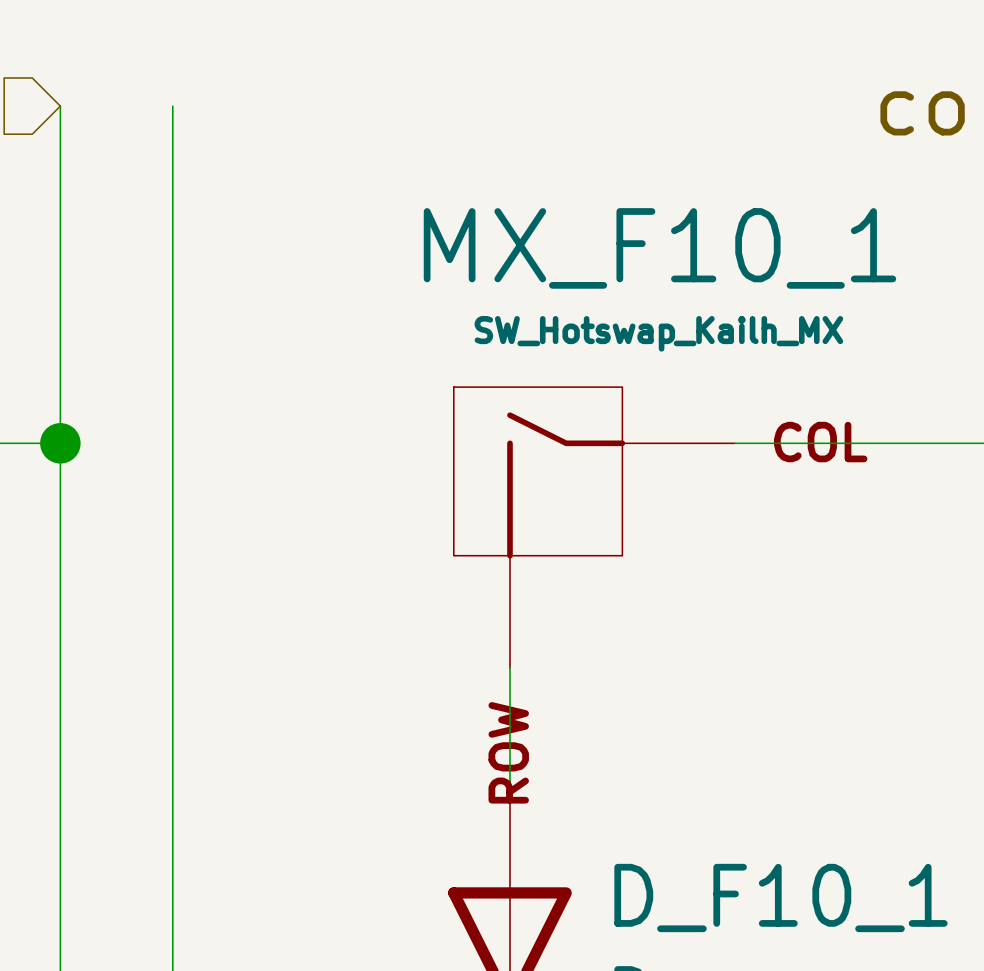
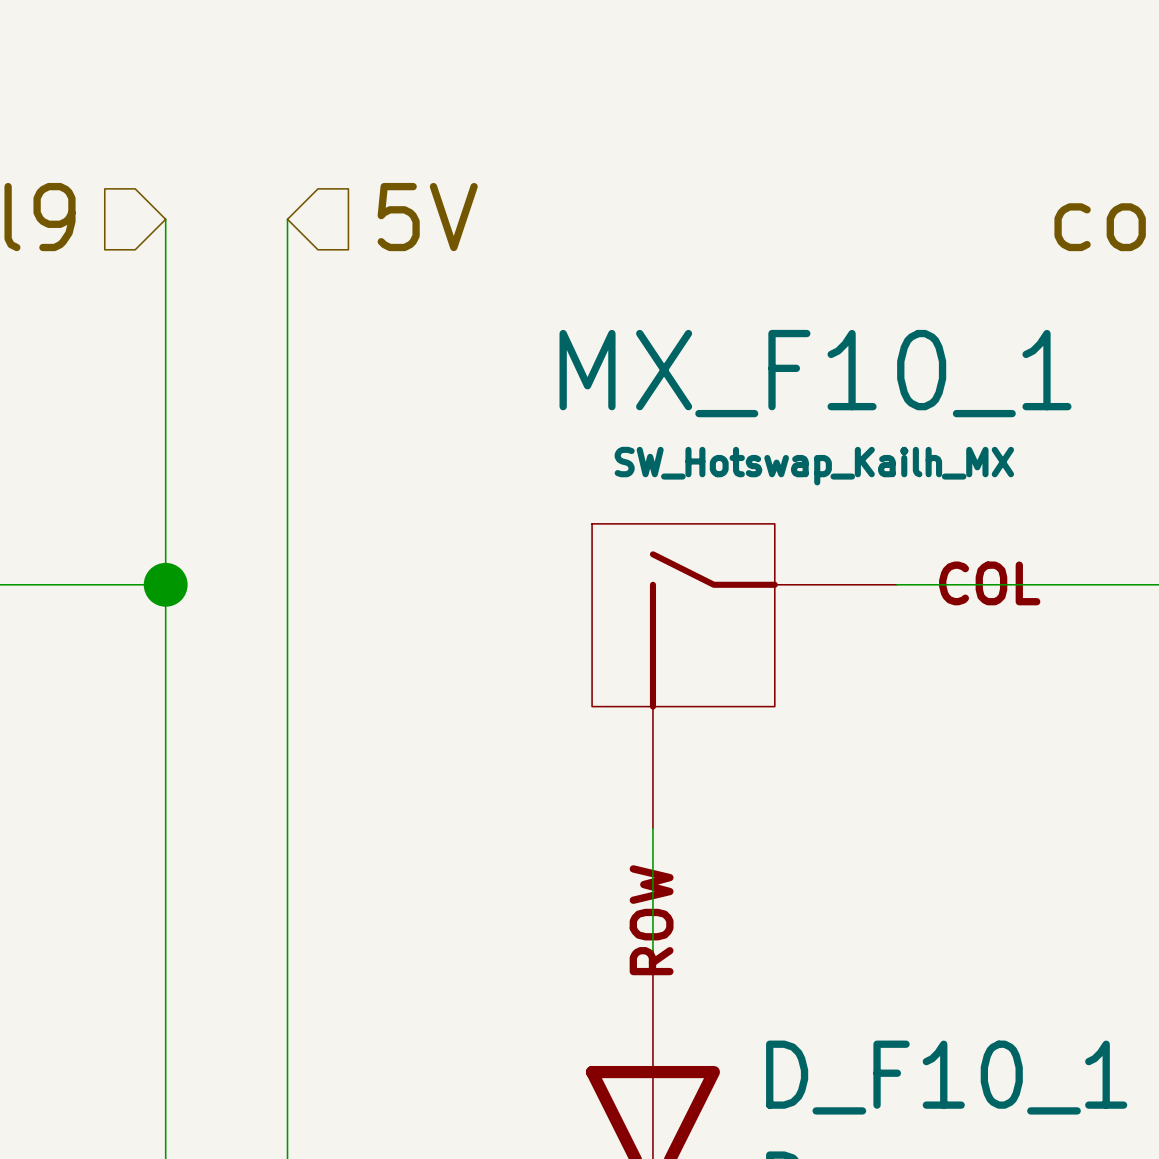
hierarchical label: none -> 5V (427, 217)

